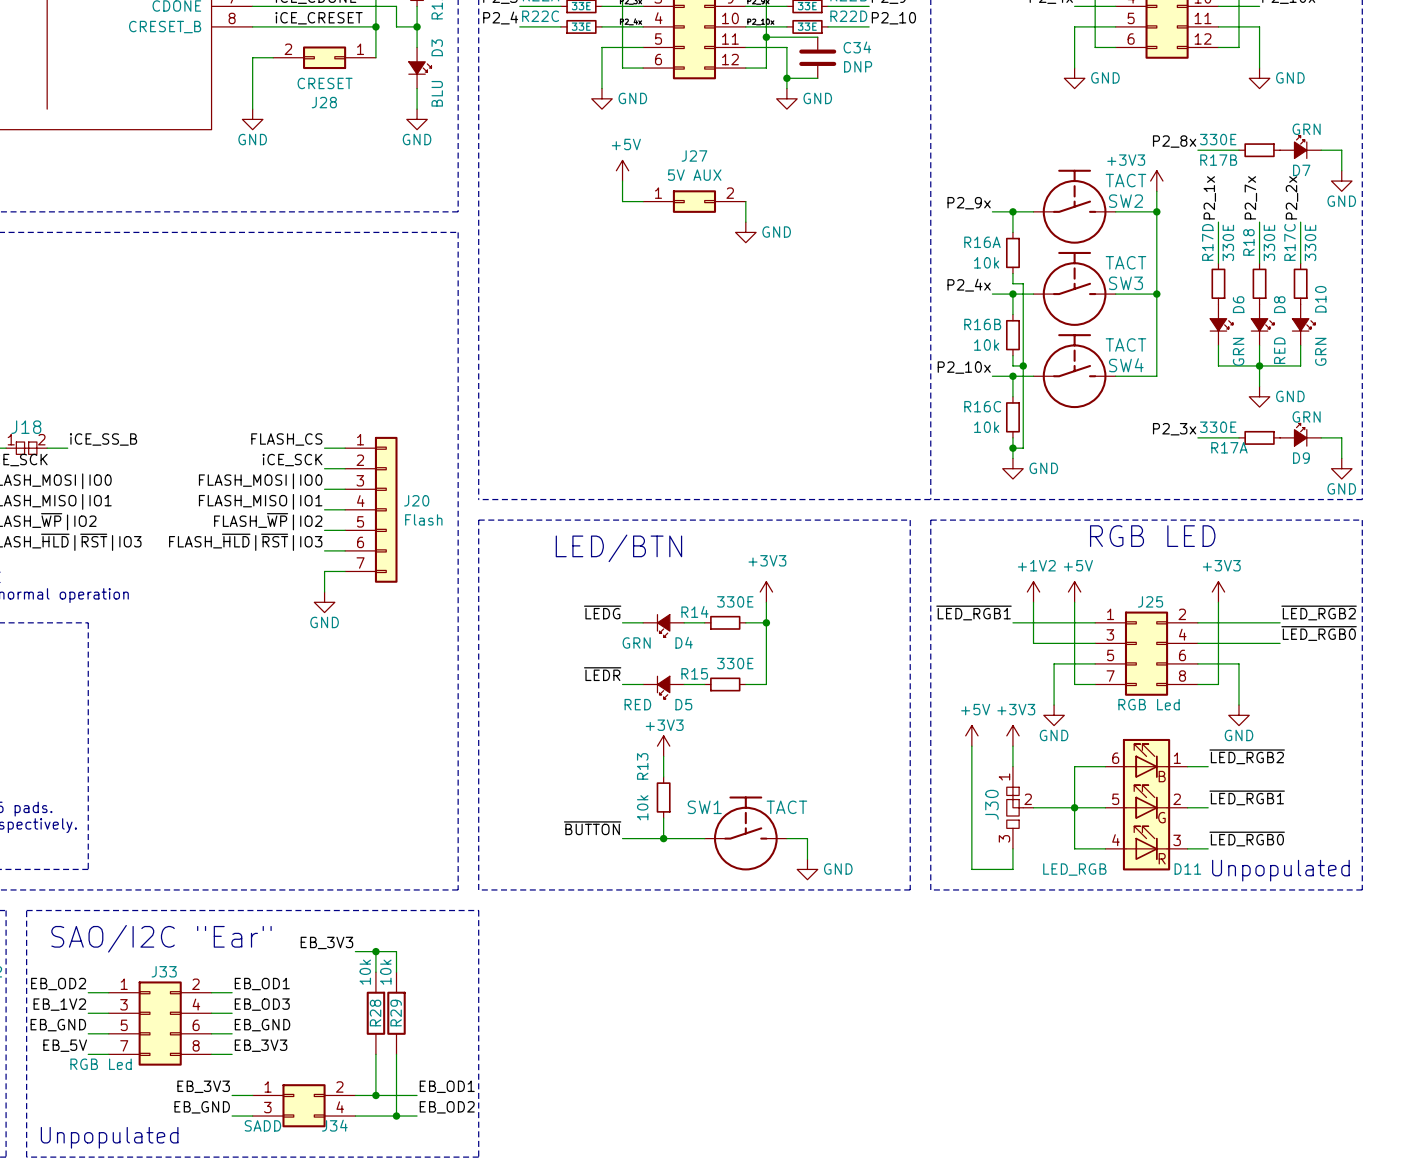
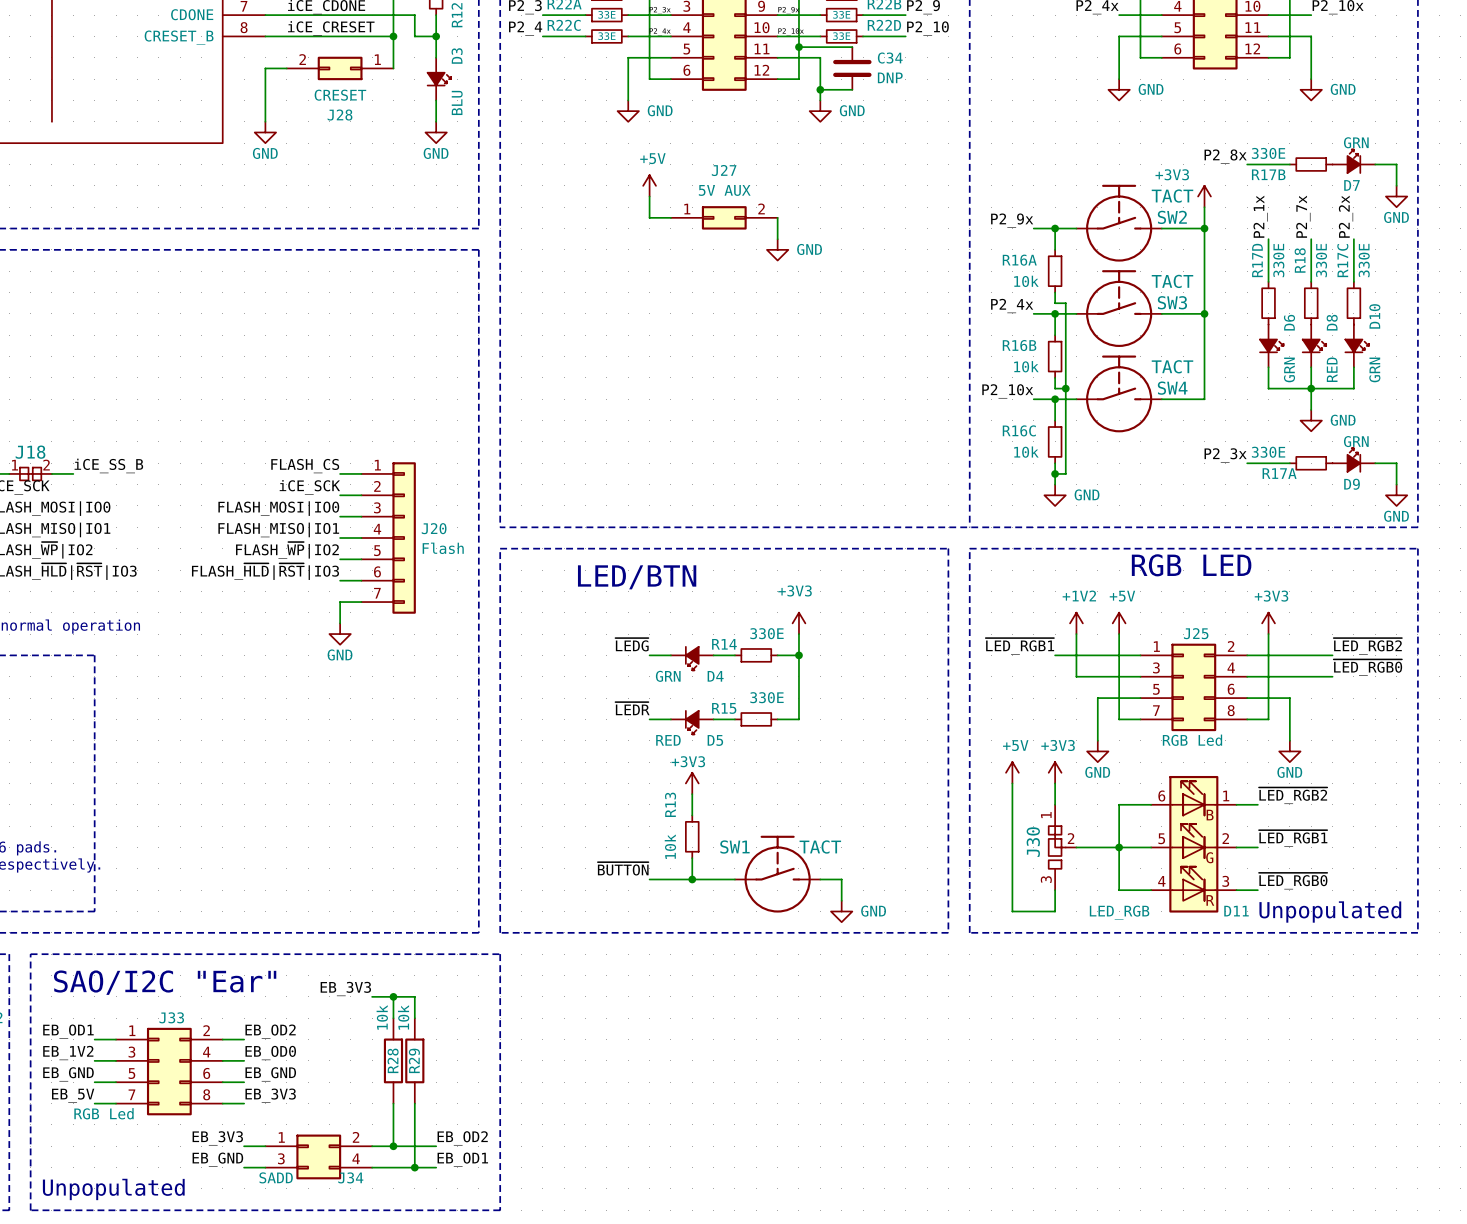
label: EB_OD2 (58, 984) -> EB_OD1 (68, 1031)
label: EB_OD1 (262, 984) -> EB_OD2 (270, 1031)
label: EB_OD3 (262, 1004) -> EB_OD0 (270, 1053)
label: EB_OD1 (447, 1086) -> EB_OD2 (462, 1138)
label: EB_OD2 (447, 1107) -> EB_OD1 (462, 1159)

